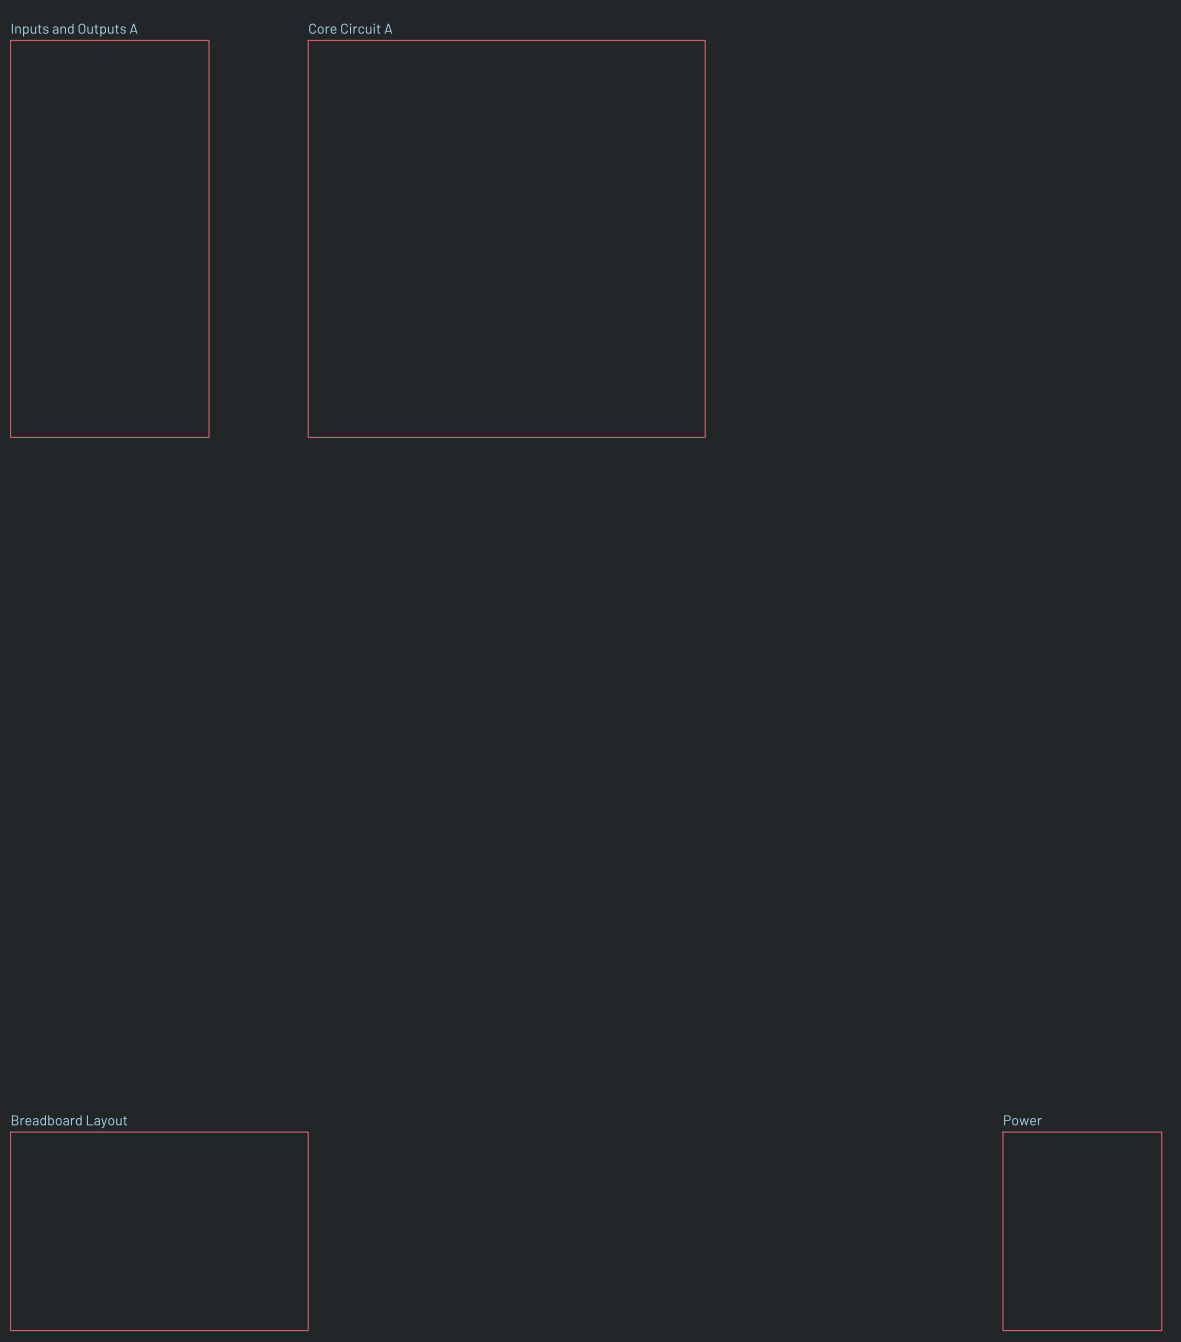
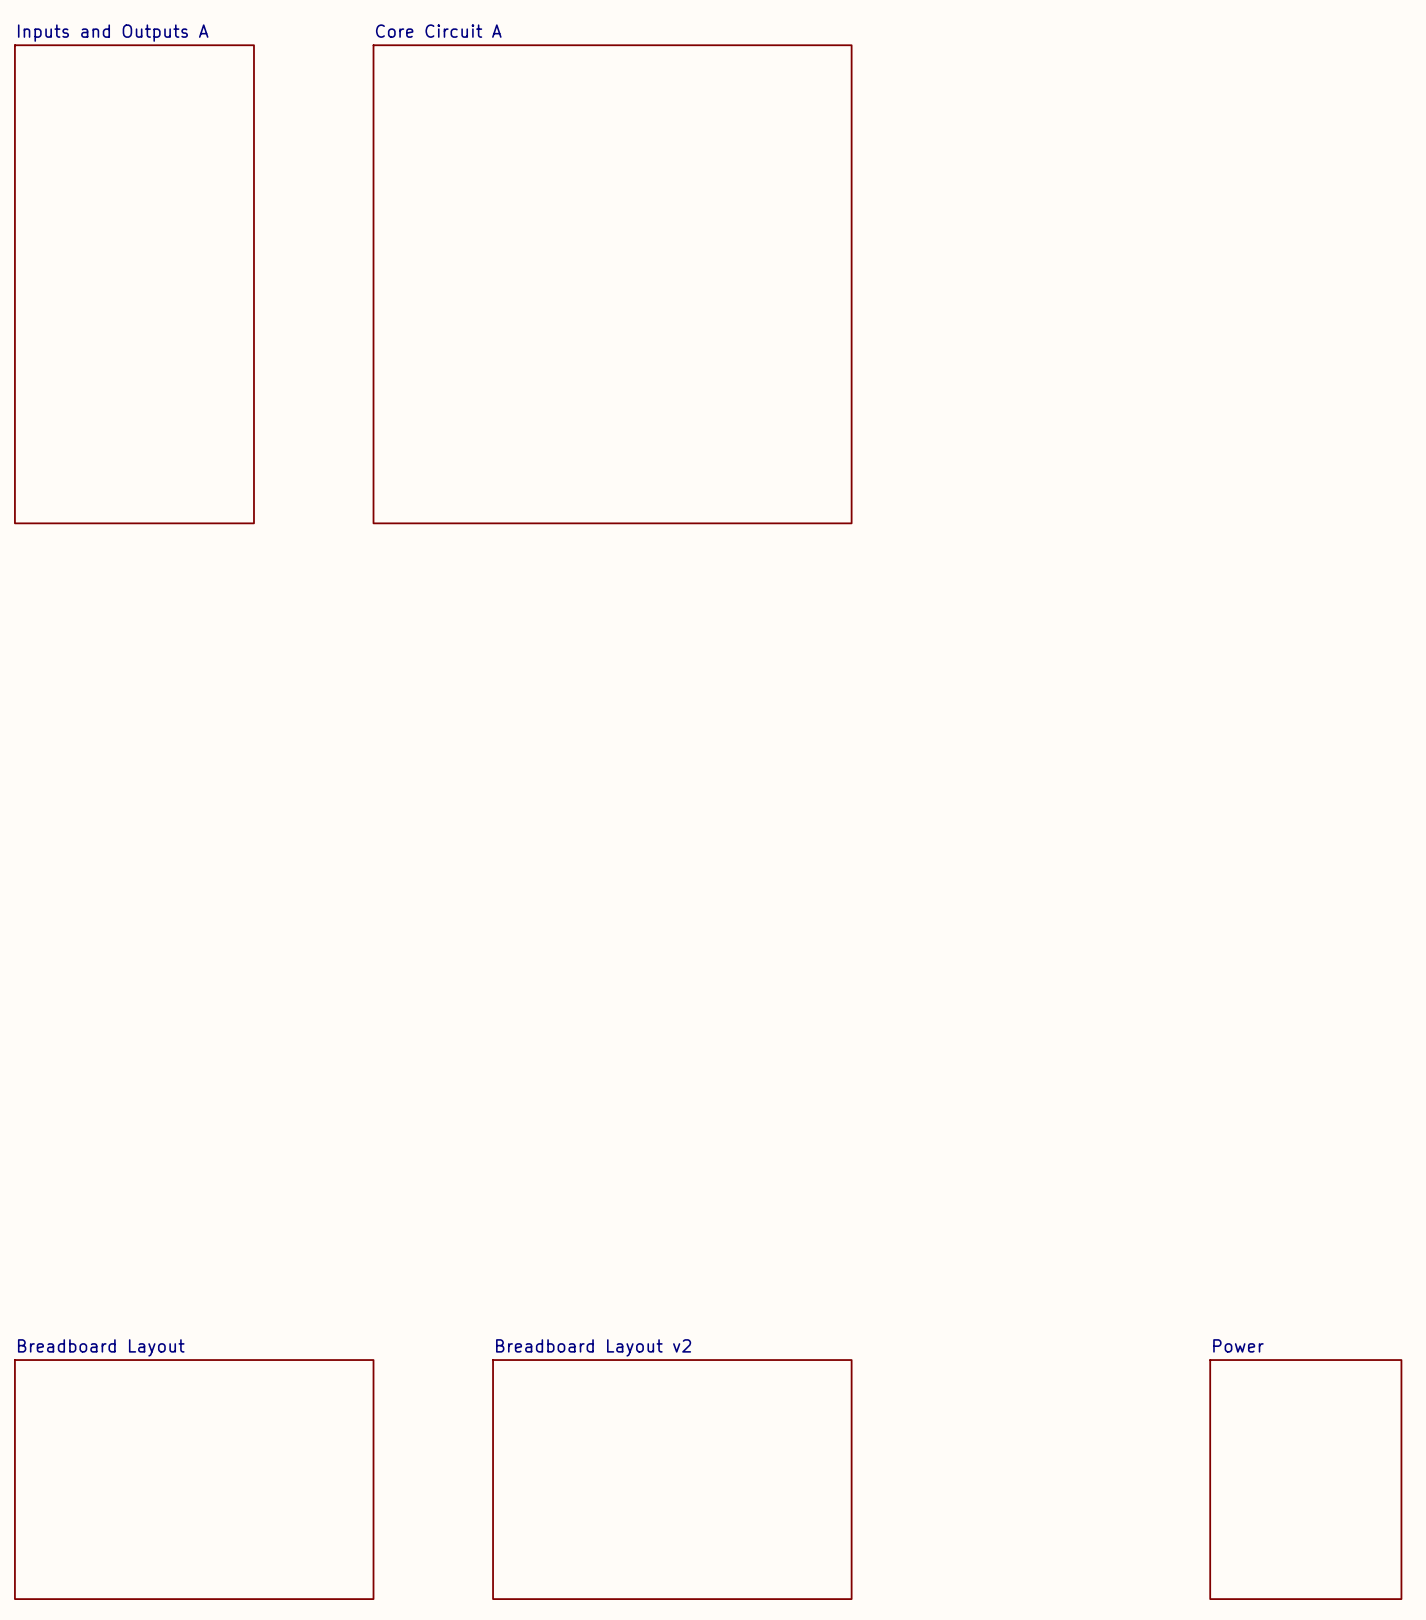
sheet Breadboard Layout v2: none -> (672, 1479)

